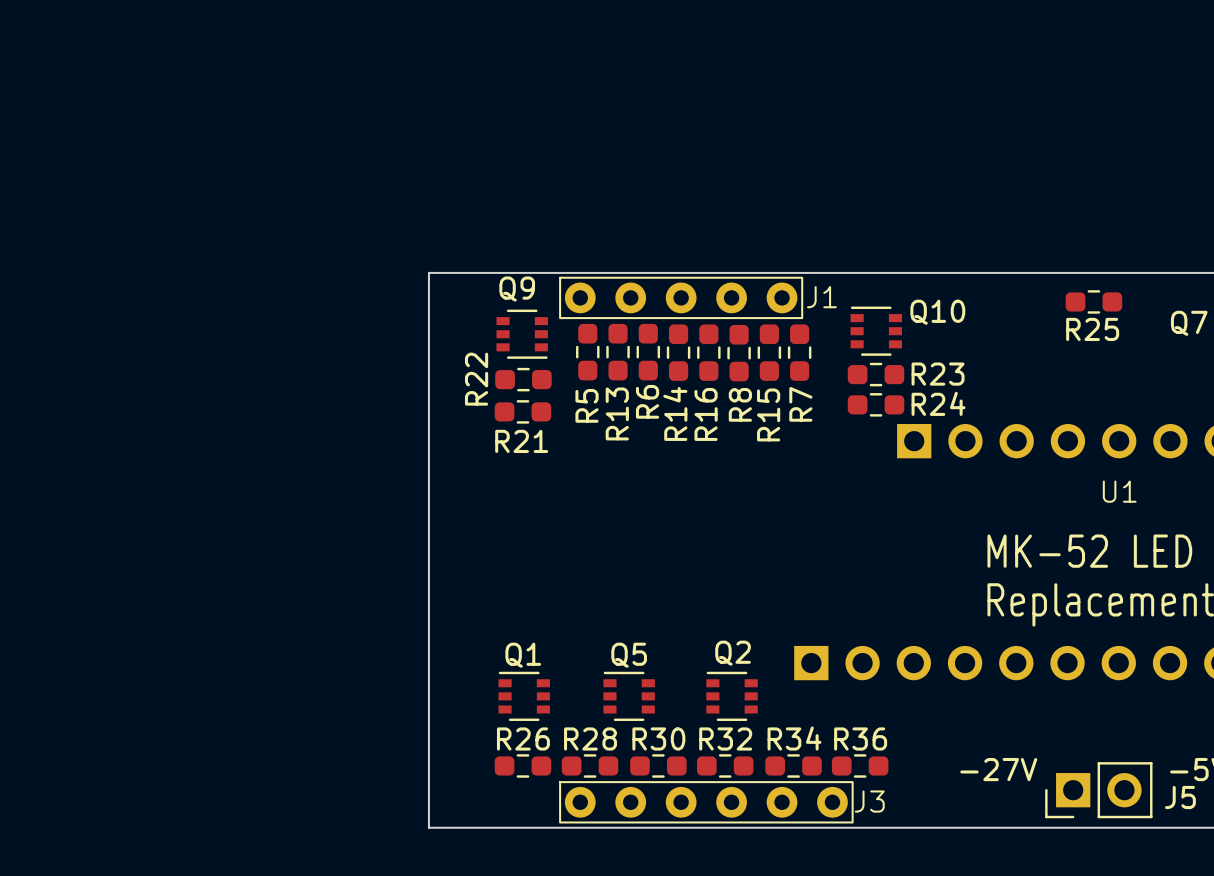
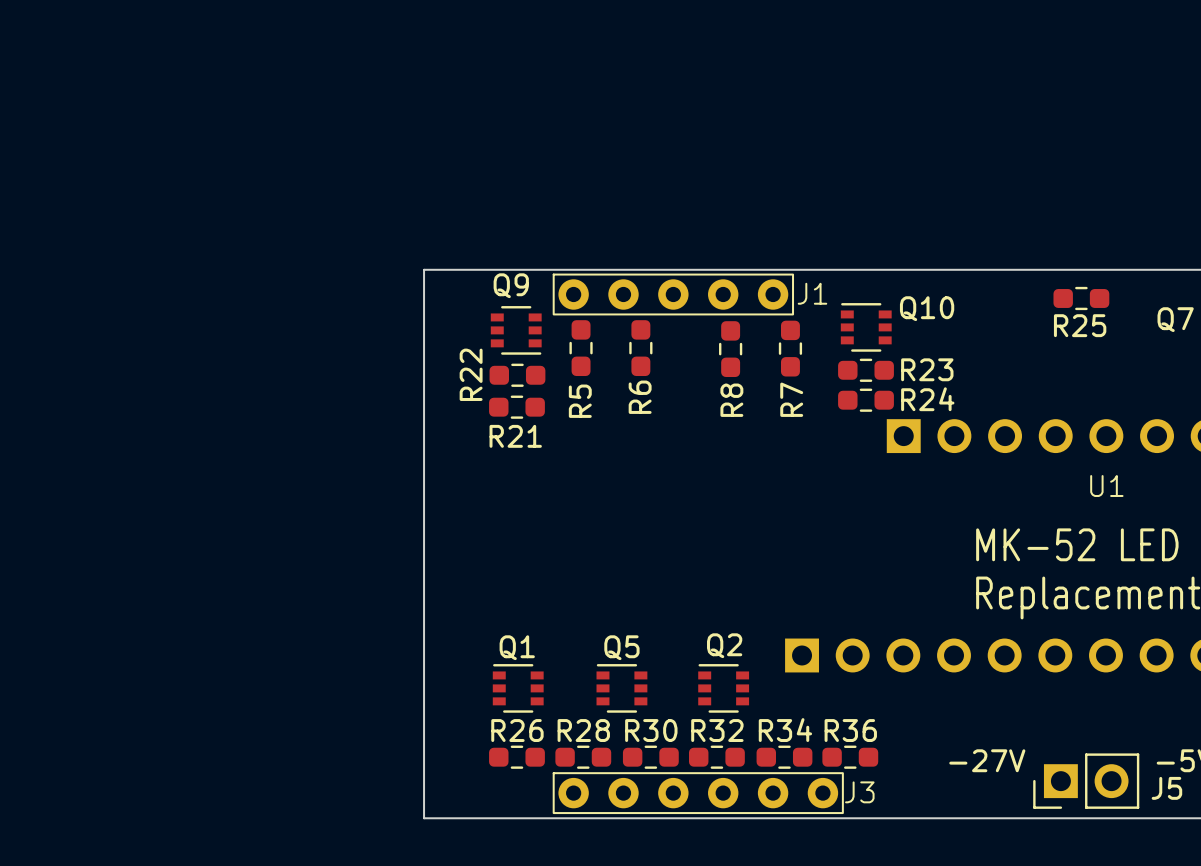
R13: (618, 352) -> none
R14: (678, 352) -> none
R16: (708, 352) -> none
R15: (769, 352) -> none

